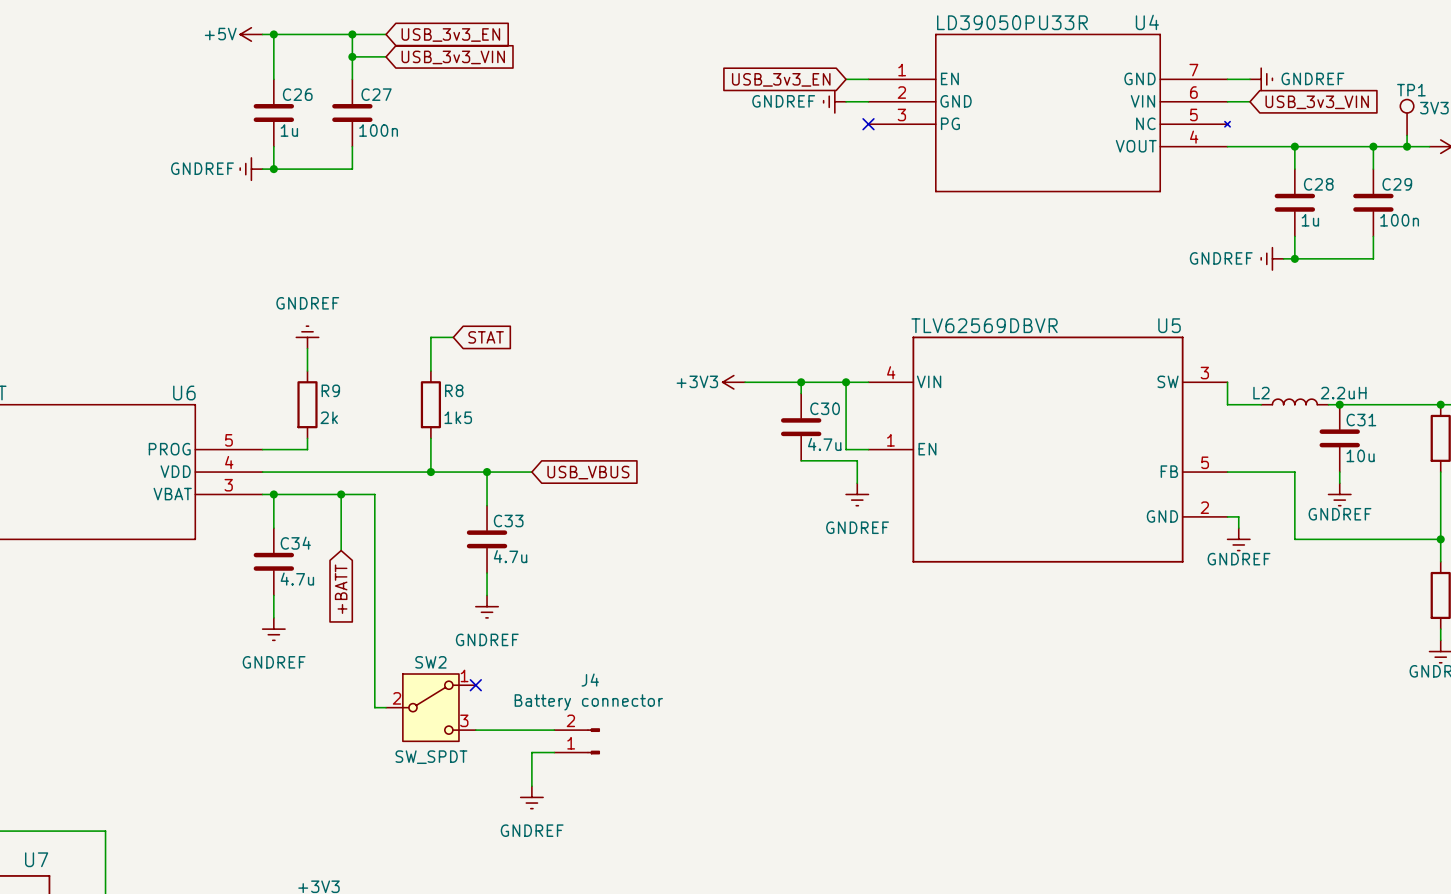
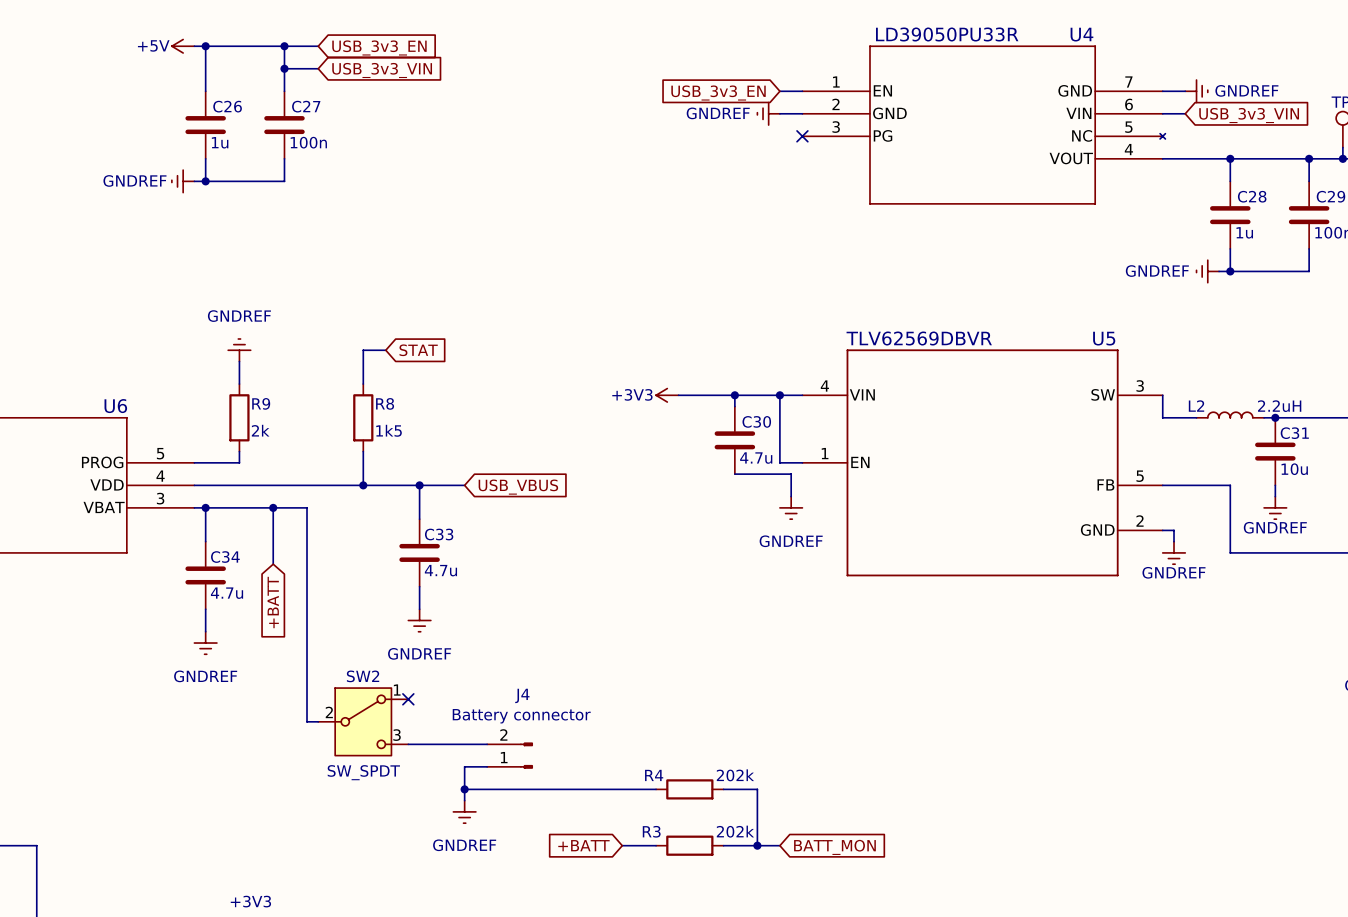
wire: none -> (464, 789) (656, 789)
junction: none -> (464, 789)
R4: none -> 202k (689, 789)
wire: none -> (723, 789) (757, 789) (757, 845)
global label: none -> +BATT (583, 845)
wire: none -> (622, 845) (656, 845)
R3: none -> 202k (689, 845)
wire: none -> (723, 845) (779, 845)
junction: none -> (757, 845)
global label: none -> BATT_MON (834, 847)

